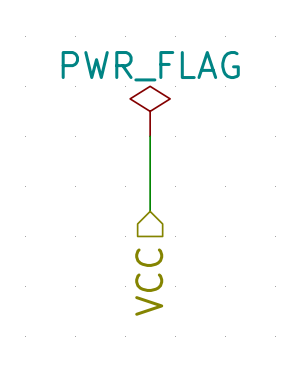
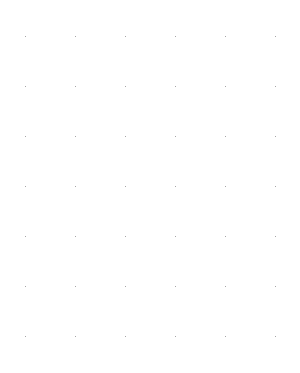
power symbol: PWR_FLAG (150, 111) -> none
wire: (150, 136) (150, 211) -> none
hierarchical label: VCC (149, 282) -> none

